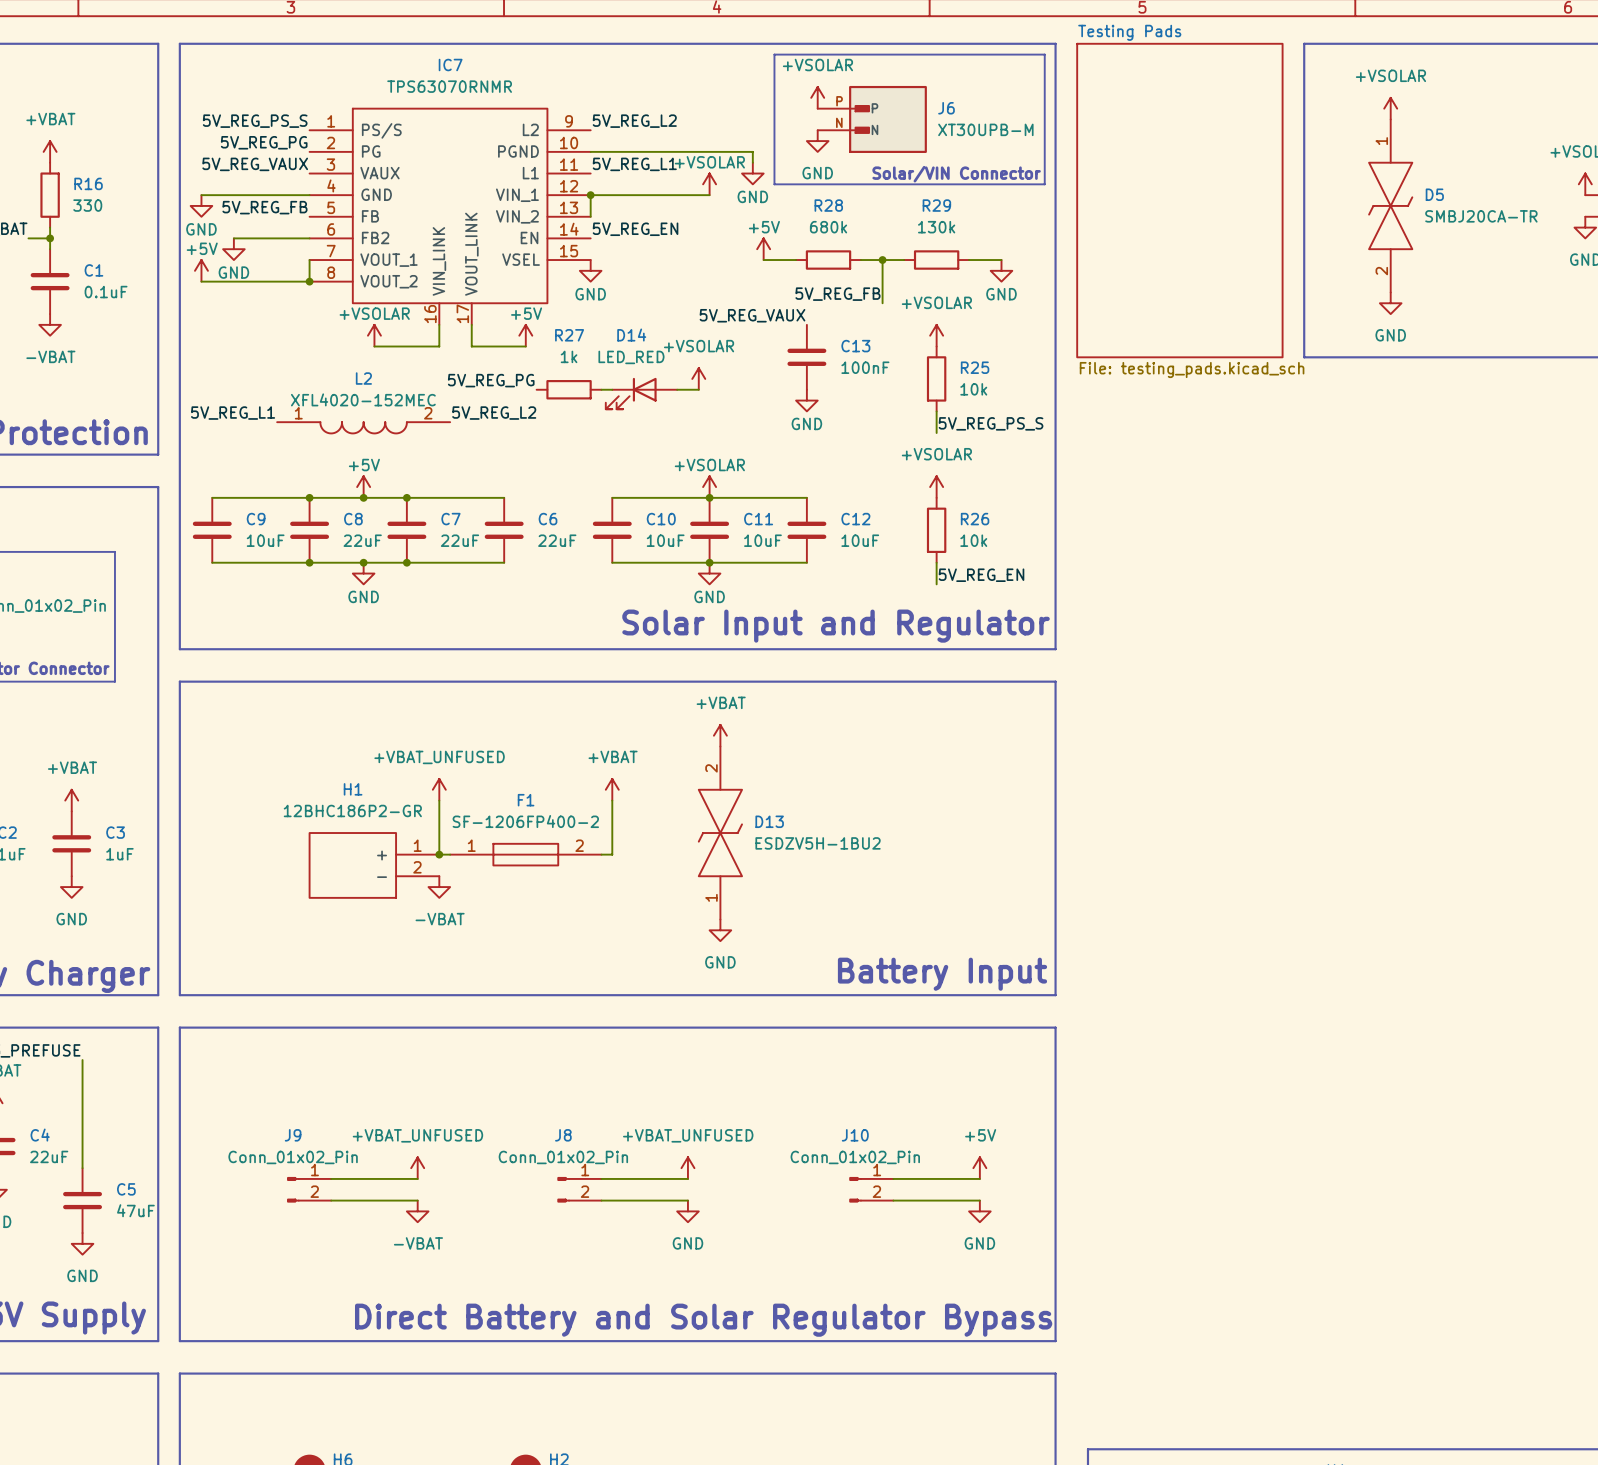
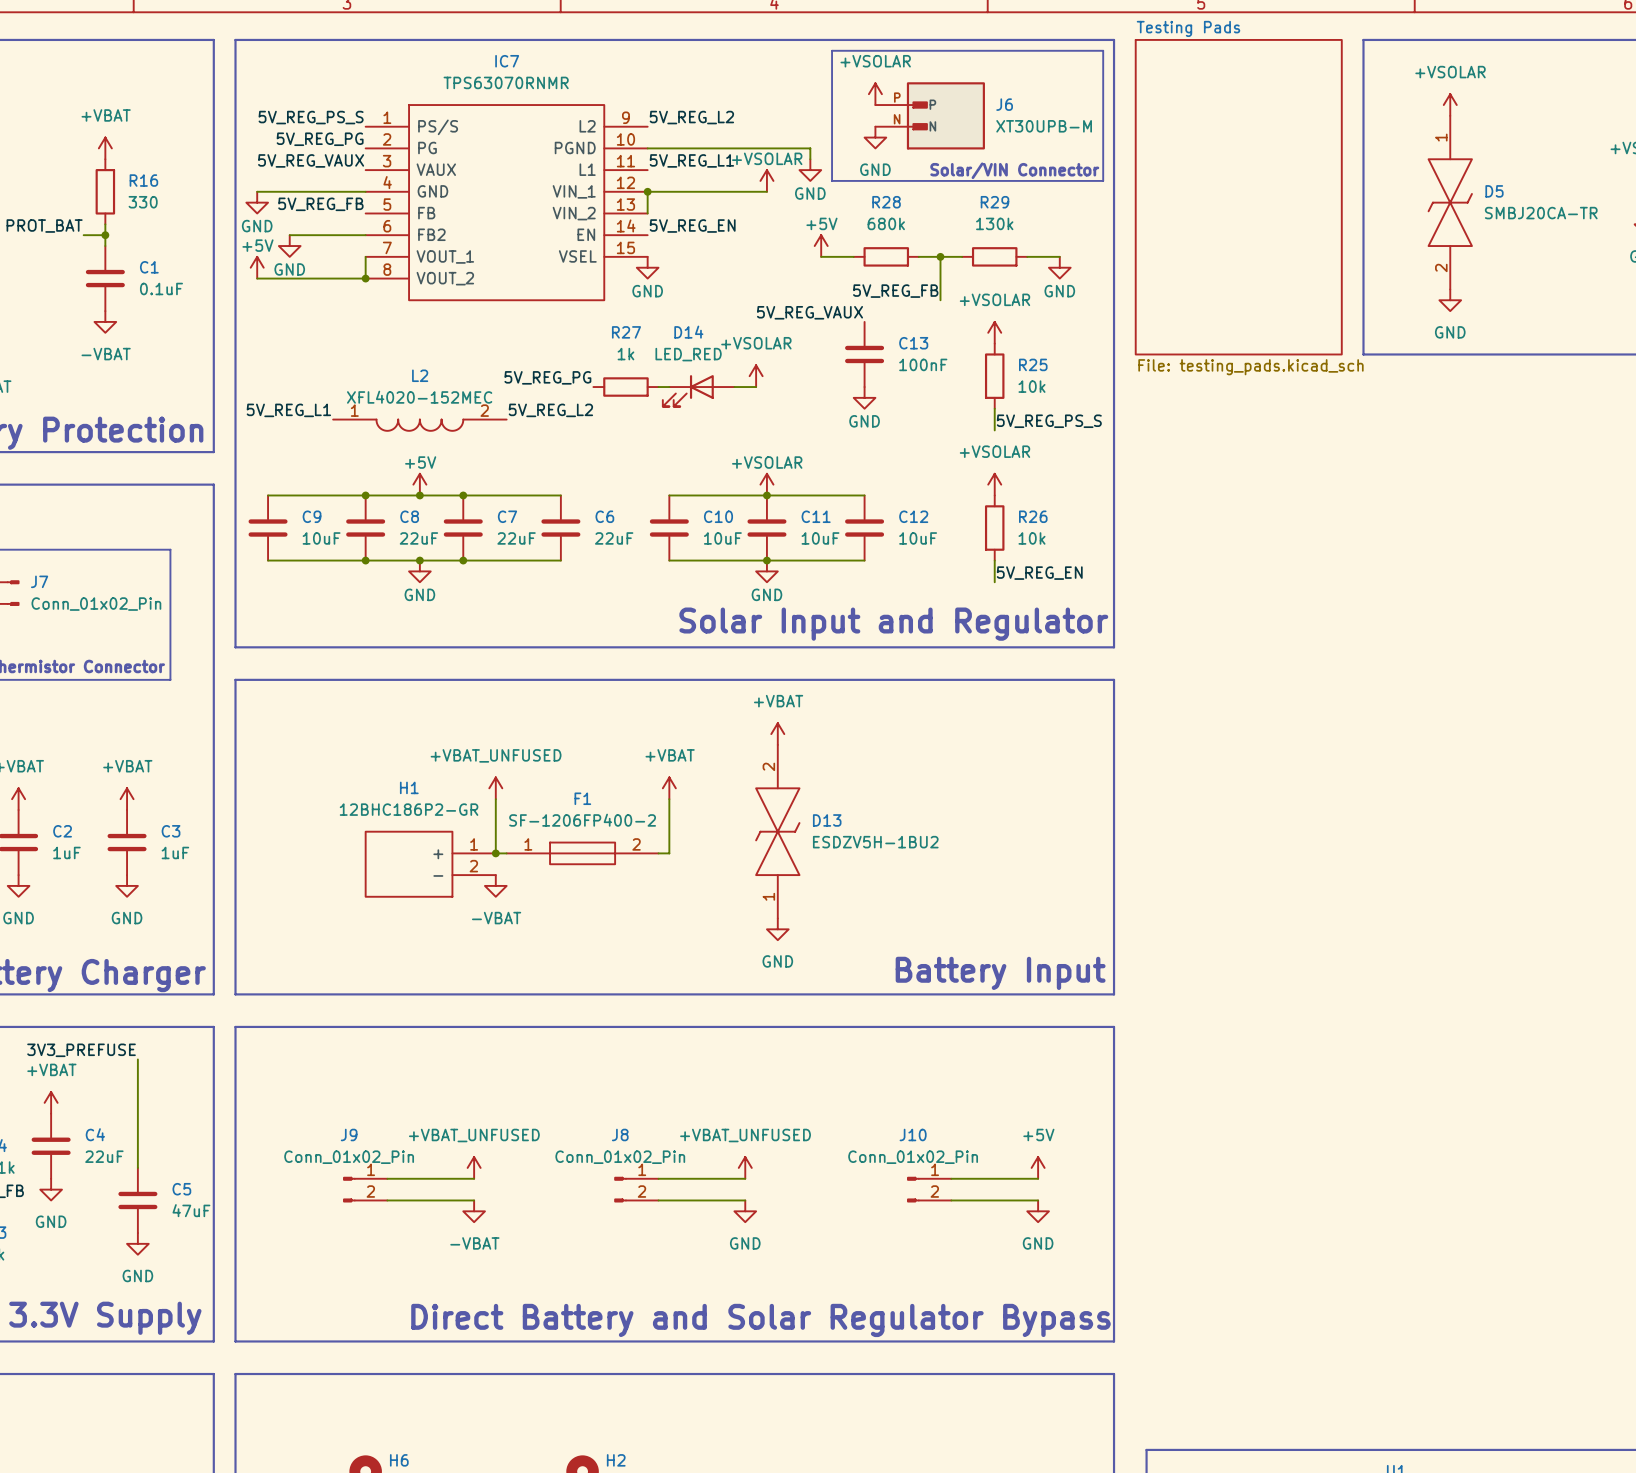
IC7 symbol: [309, 108, 591, 325] -> [365, 104, 648, 301]
wire: (439, 324) (439, 346) (374, 346) -> none
wire: (471, 324) (471, 346) (525, 346) -> none
power symbol: +VSOLAR (374, 335) -> none
power symbol: +5V (525, 335) -> none

